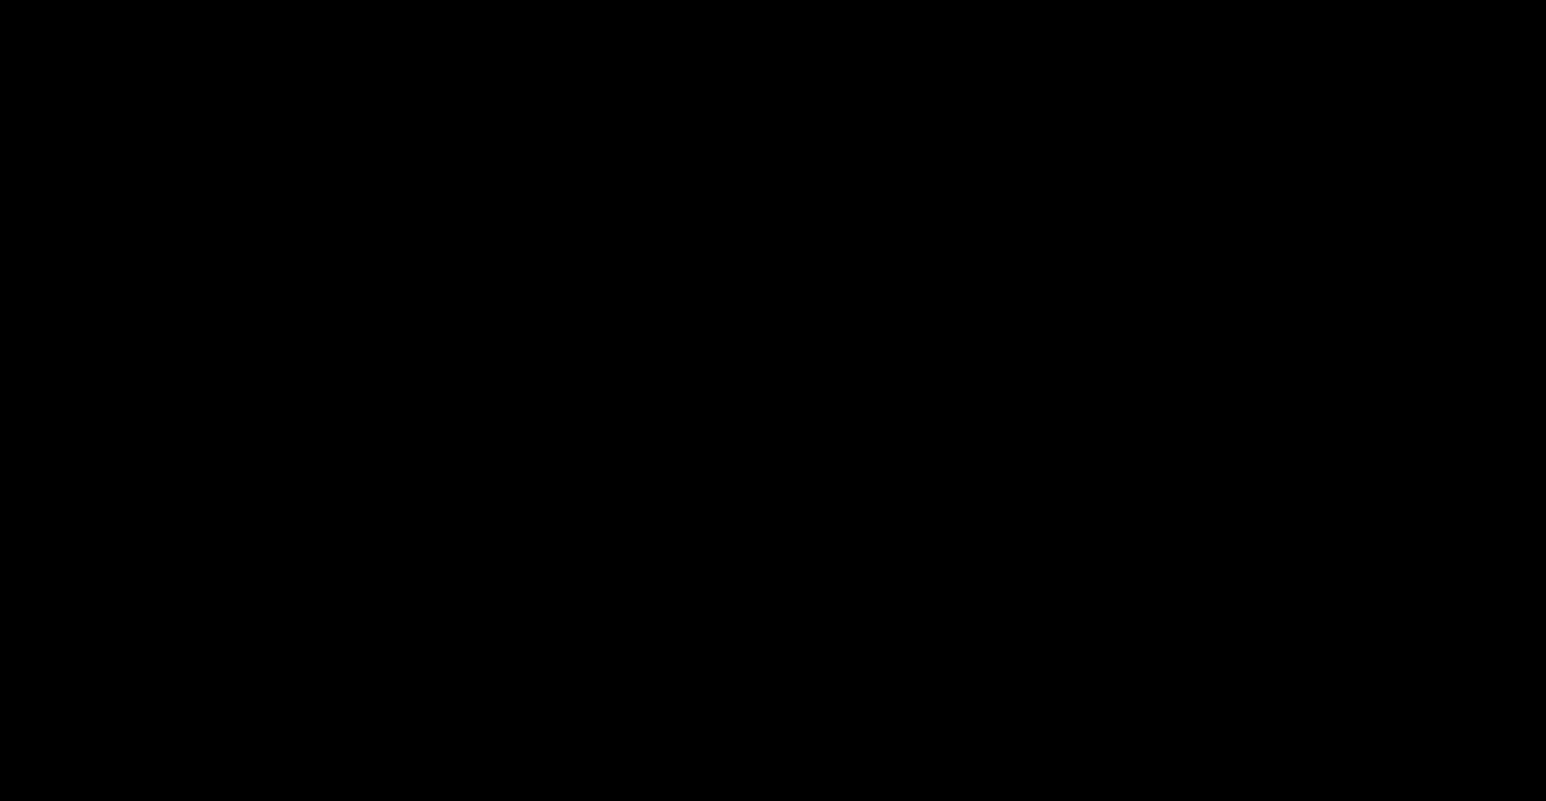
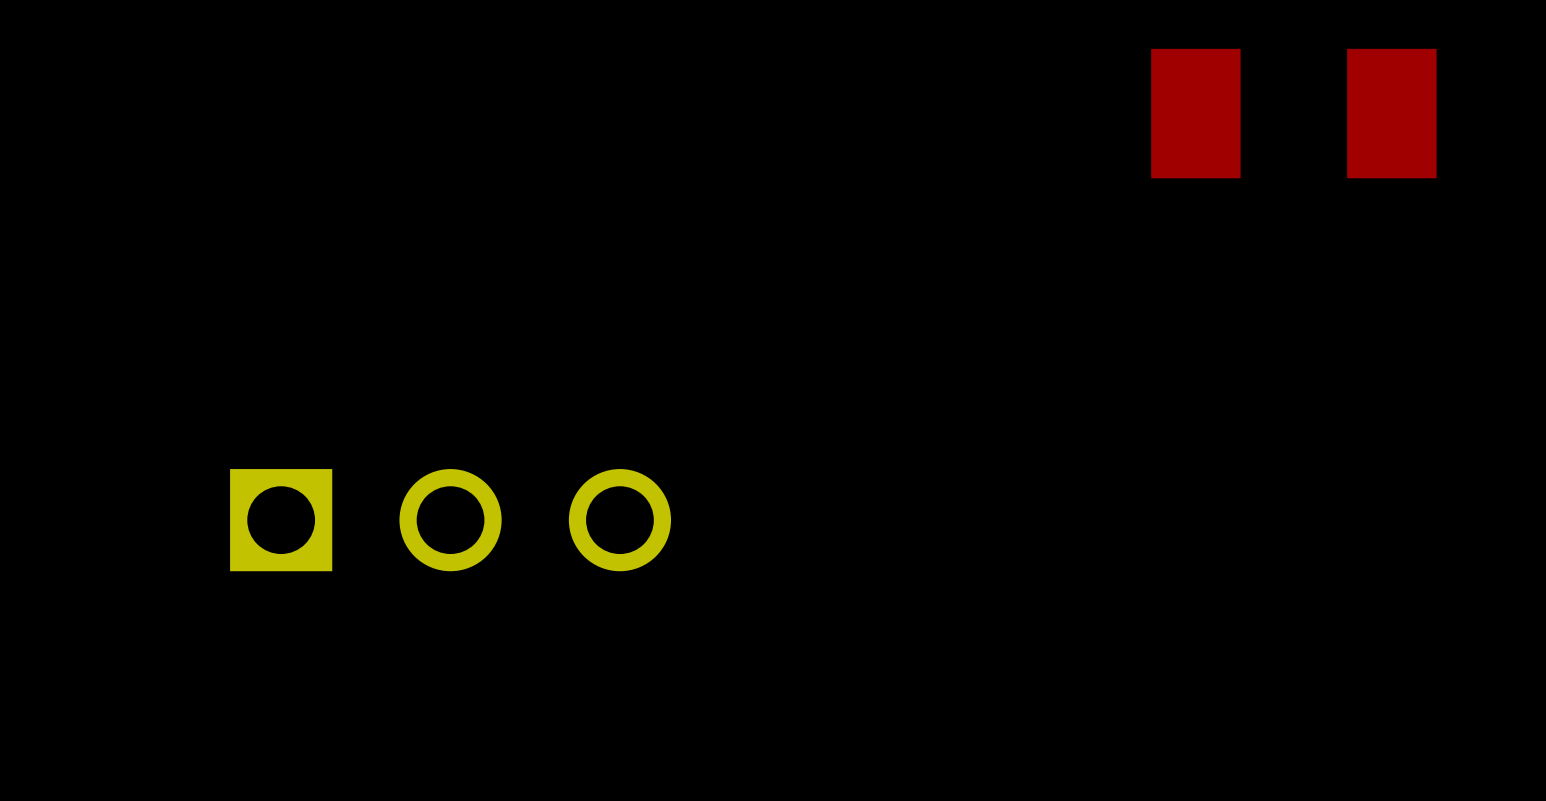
part: none -> (1293, 113)
part: none -> (450, 520)

